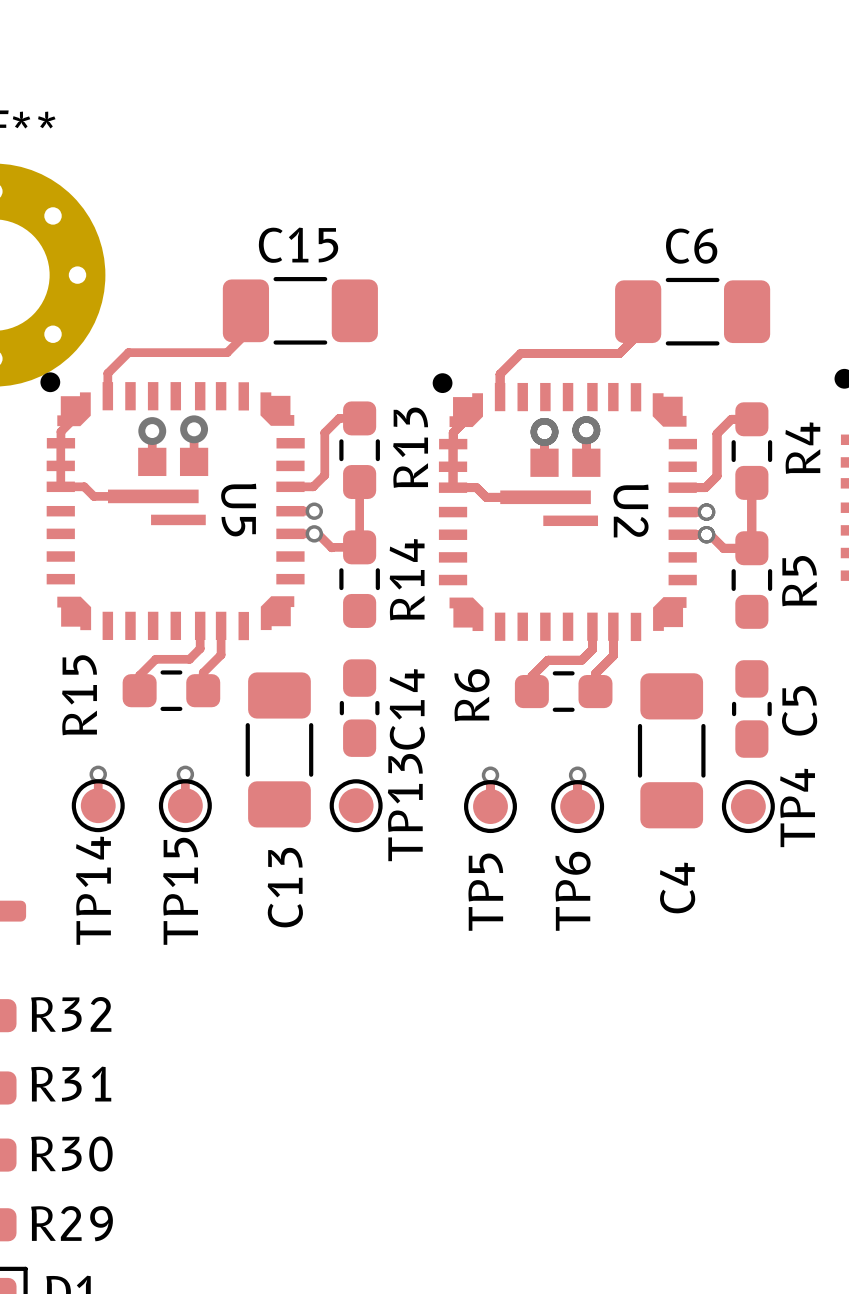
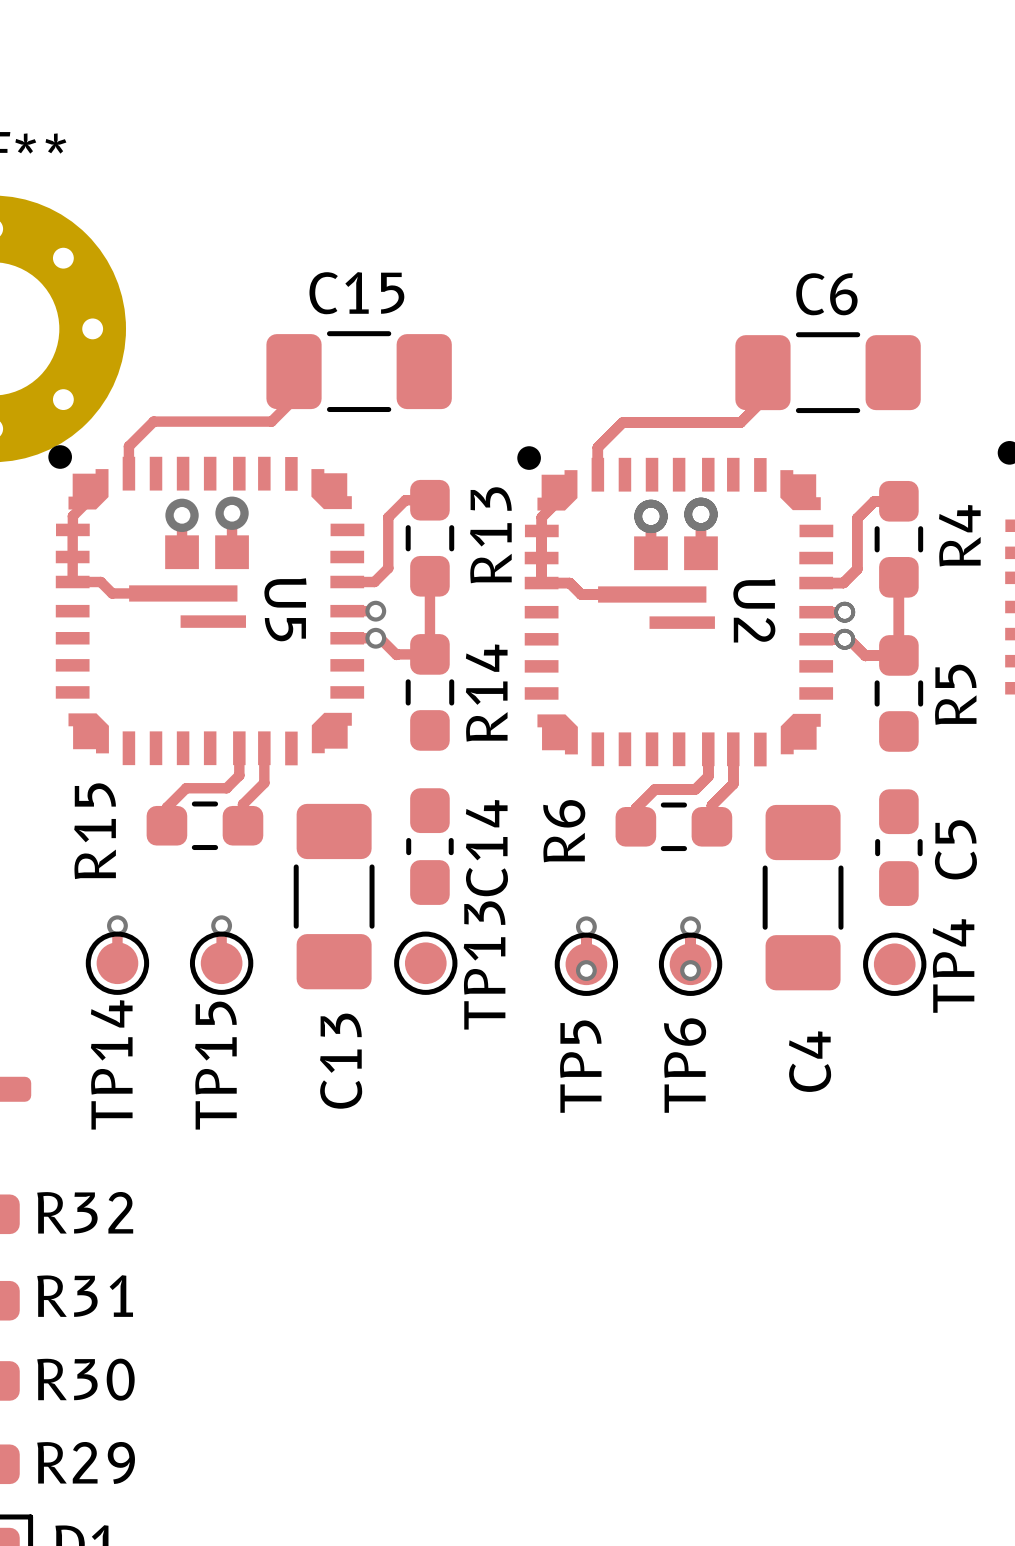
via: none -> (586, 970)
via: none -> (690, 970)

